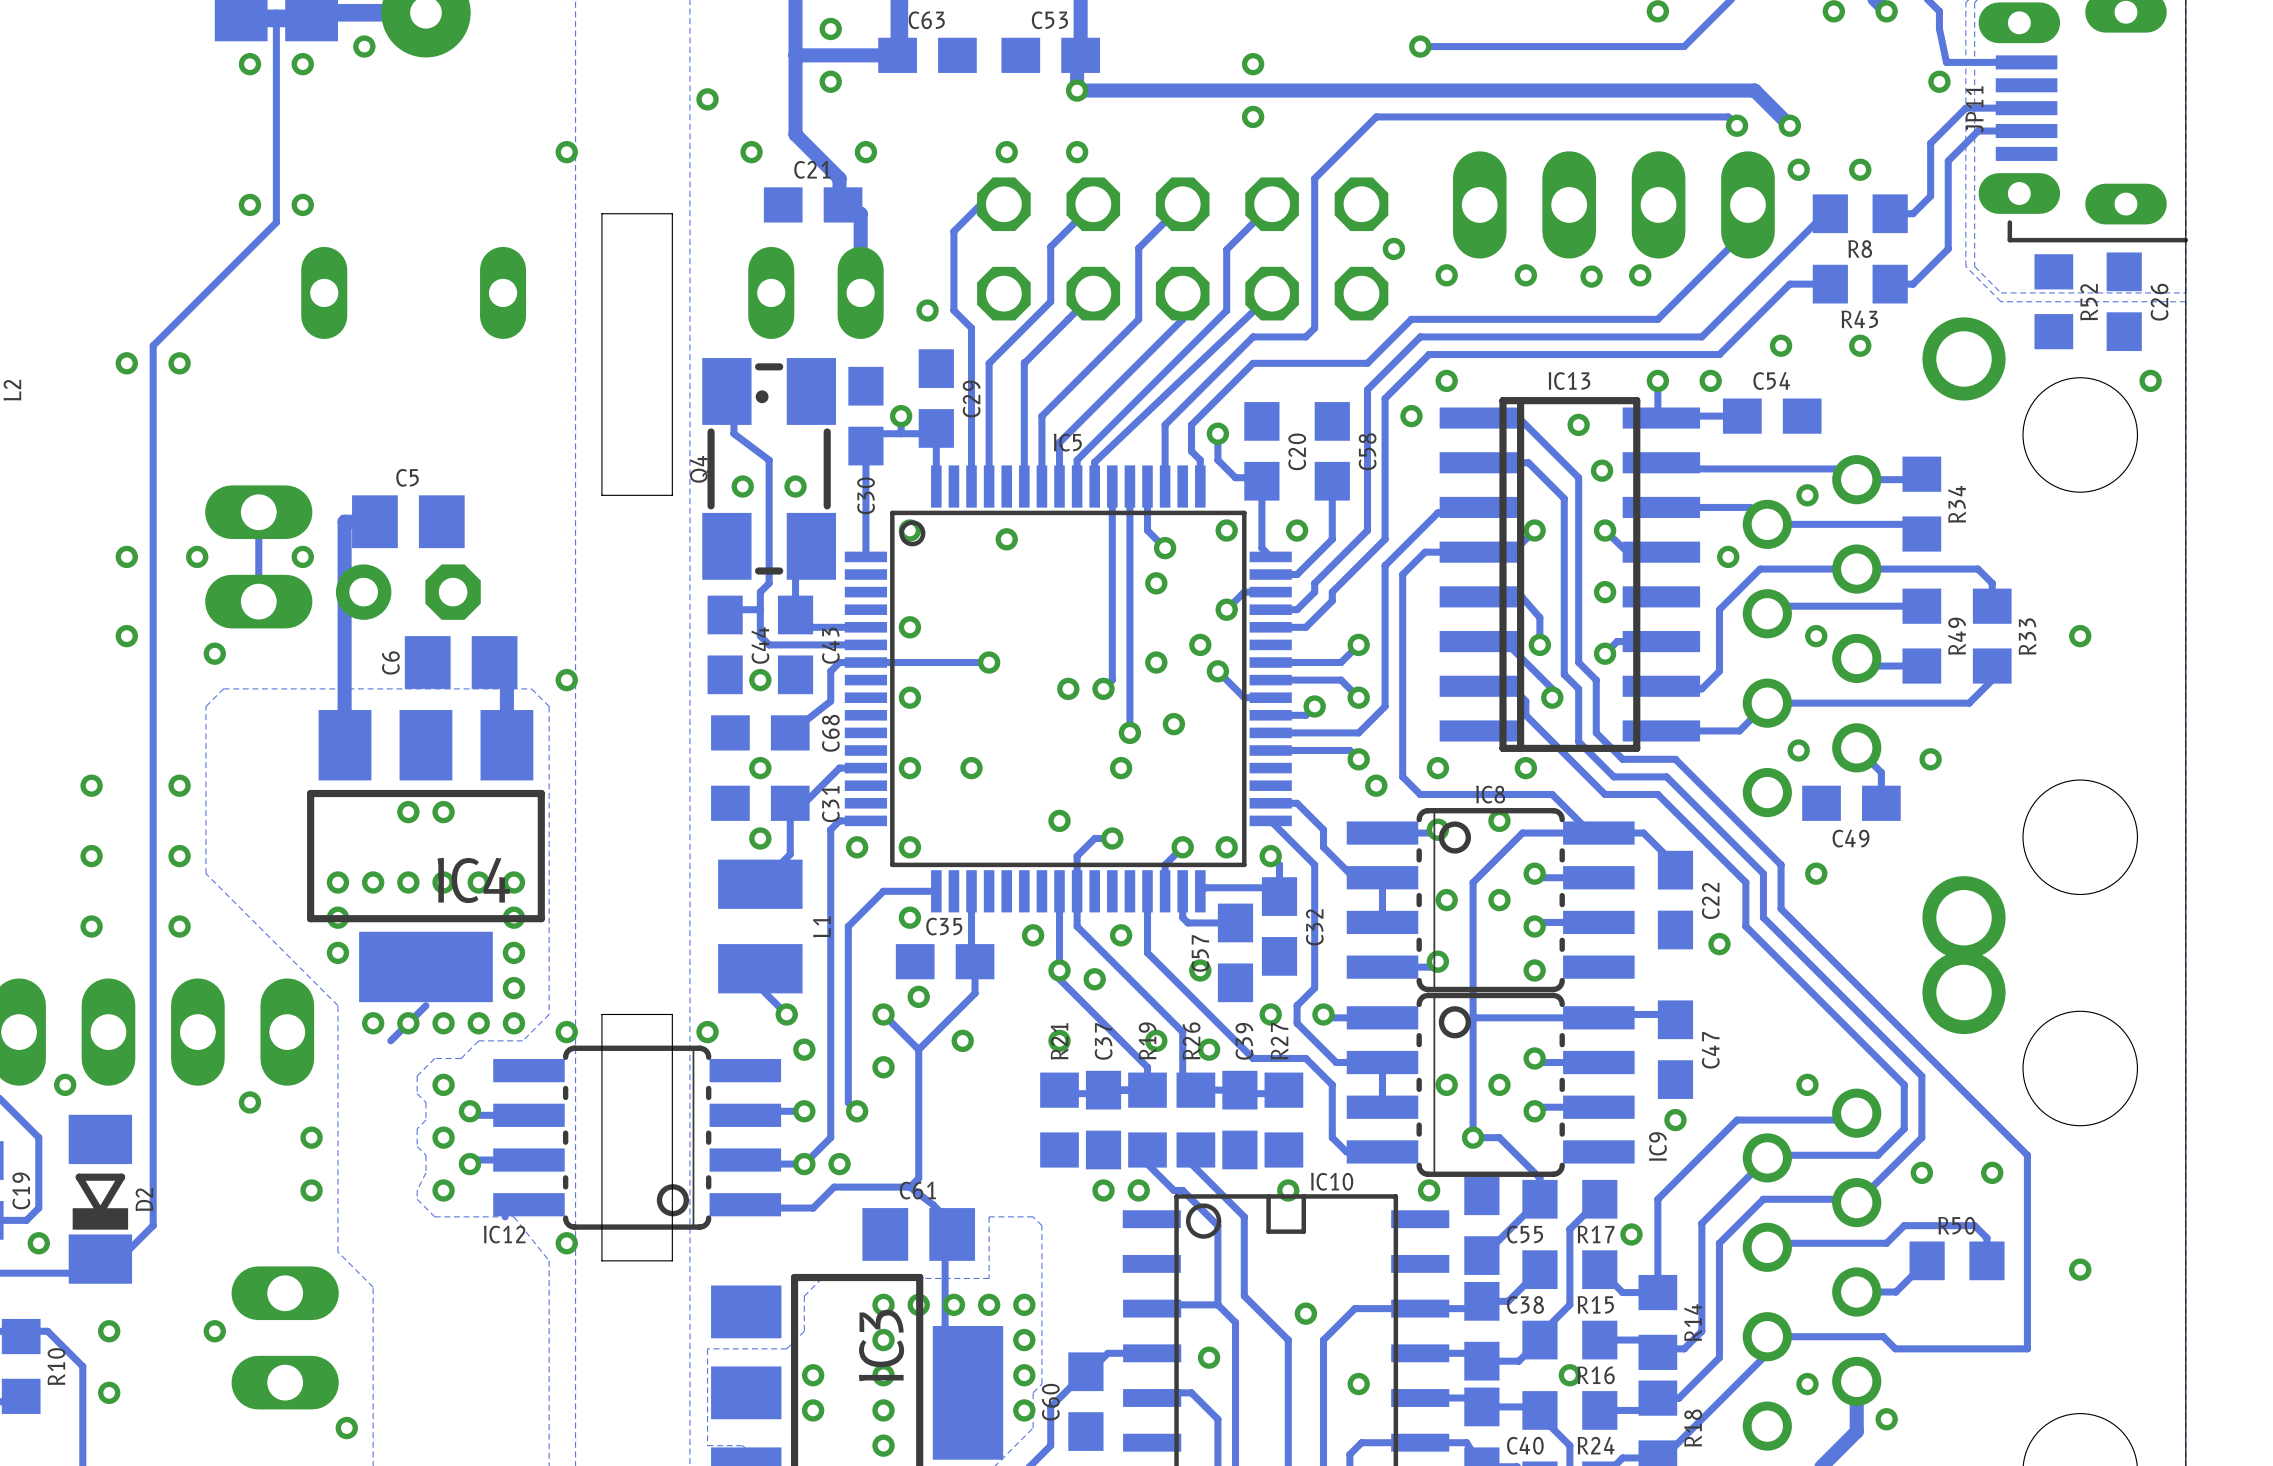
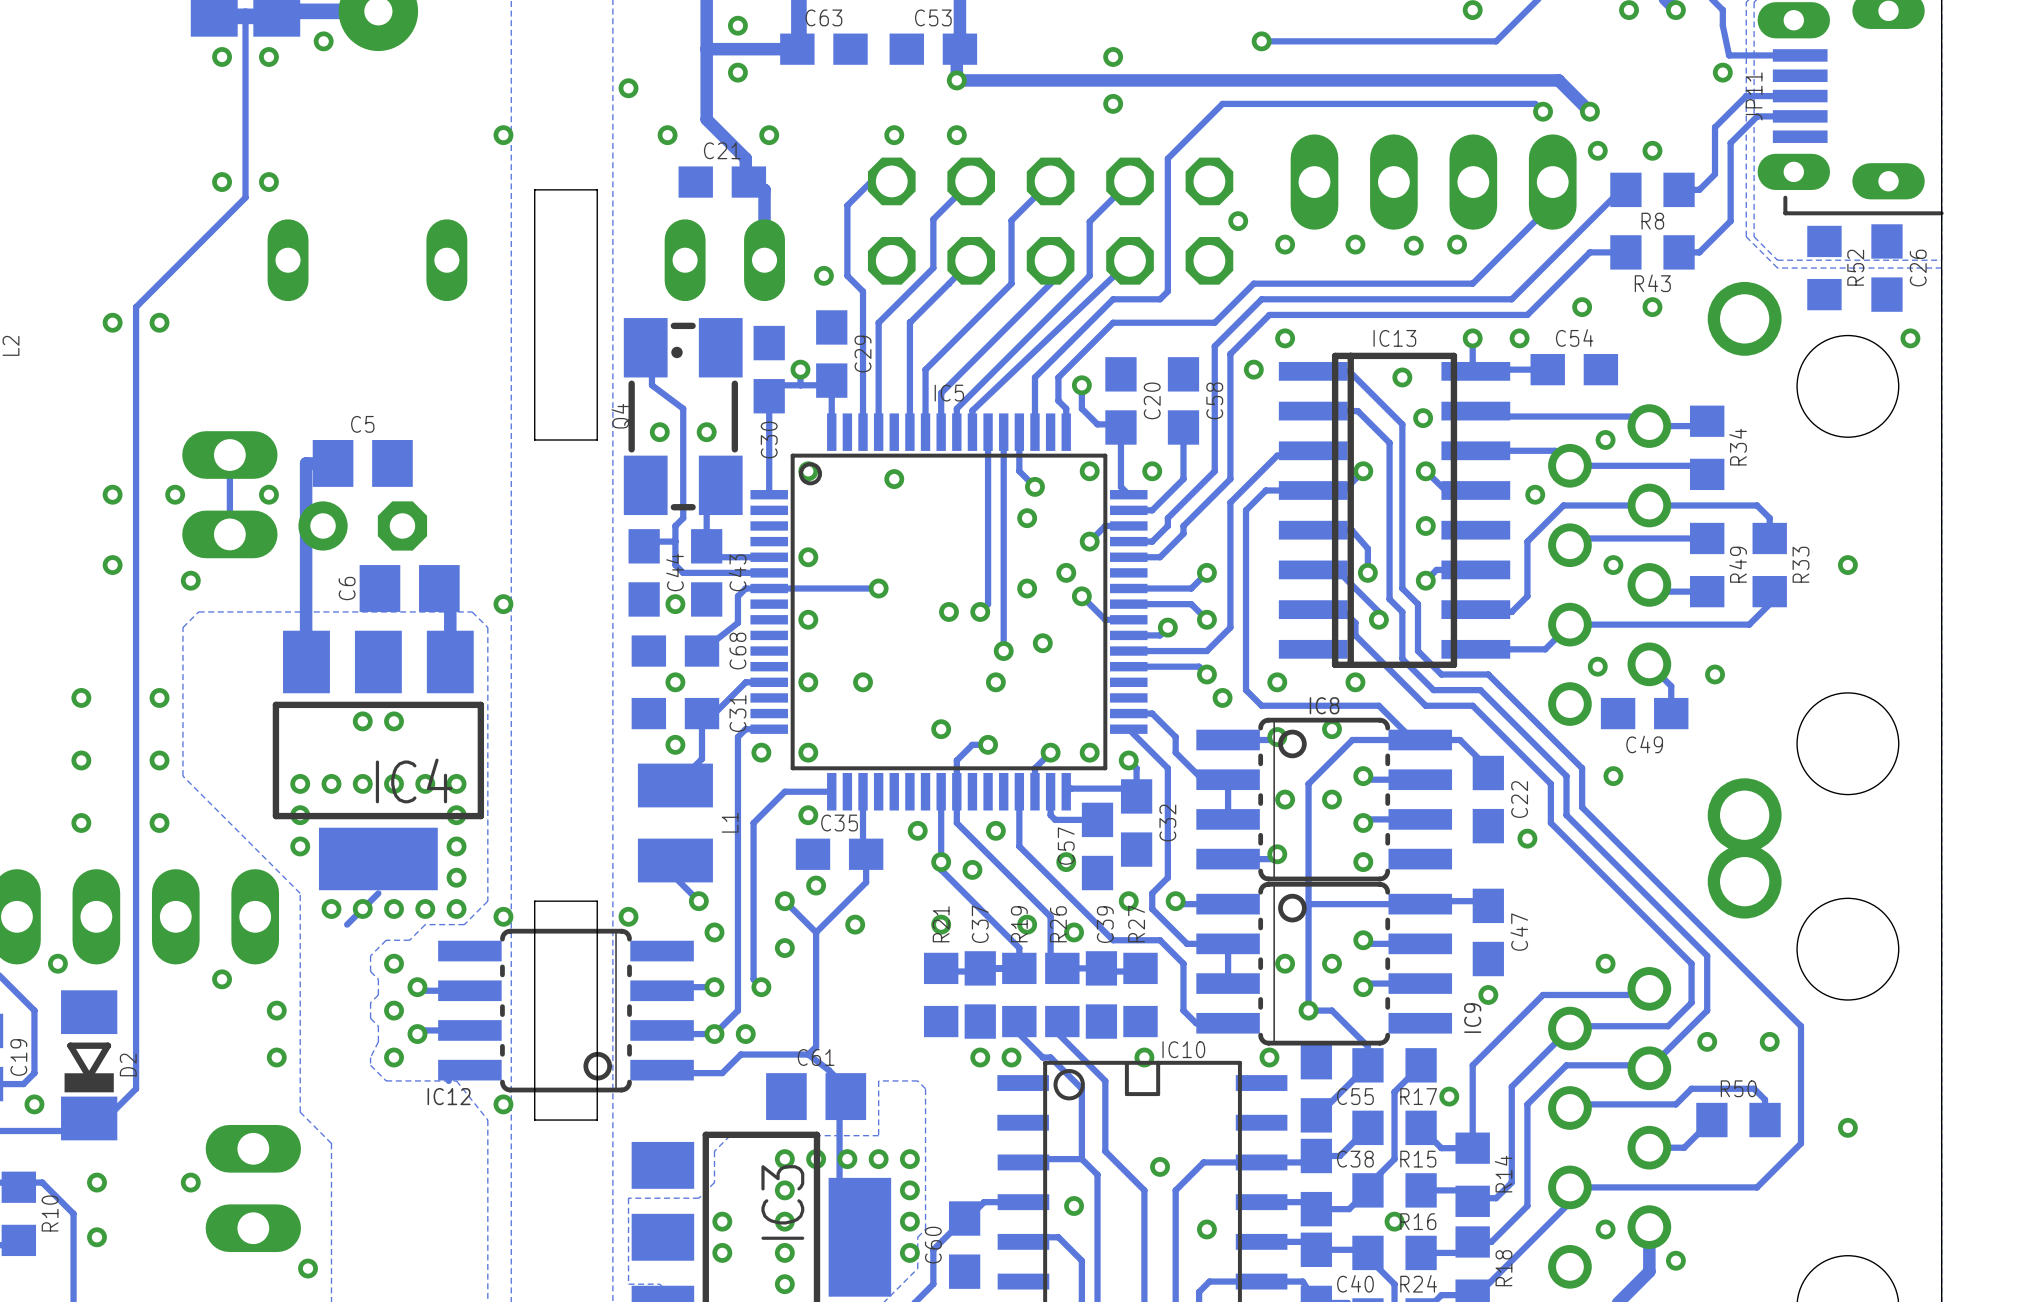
track: (2027, 1287) (2027, 1348) (1895, 1348) (1883, 1336) -> (1800, 1143) (1757, 1187) (1672, 1187)

